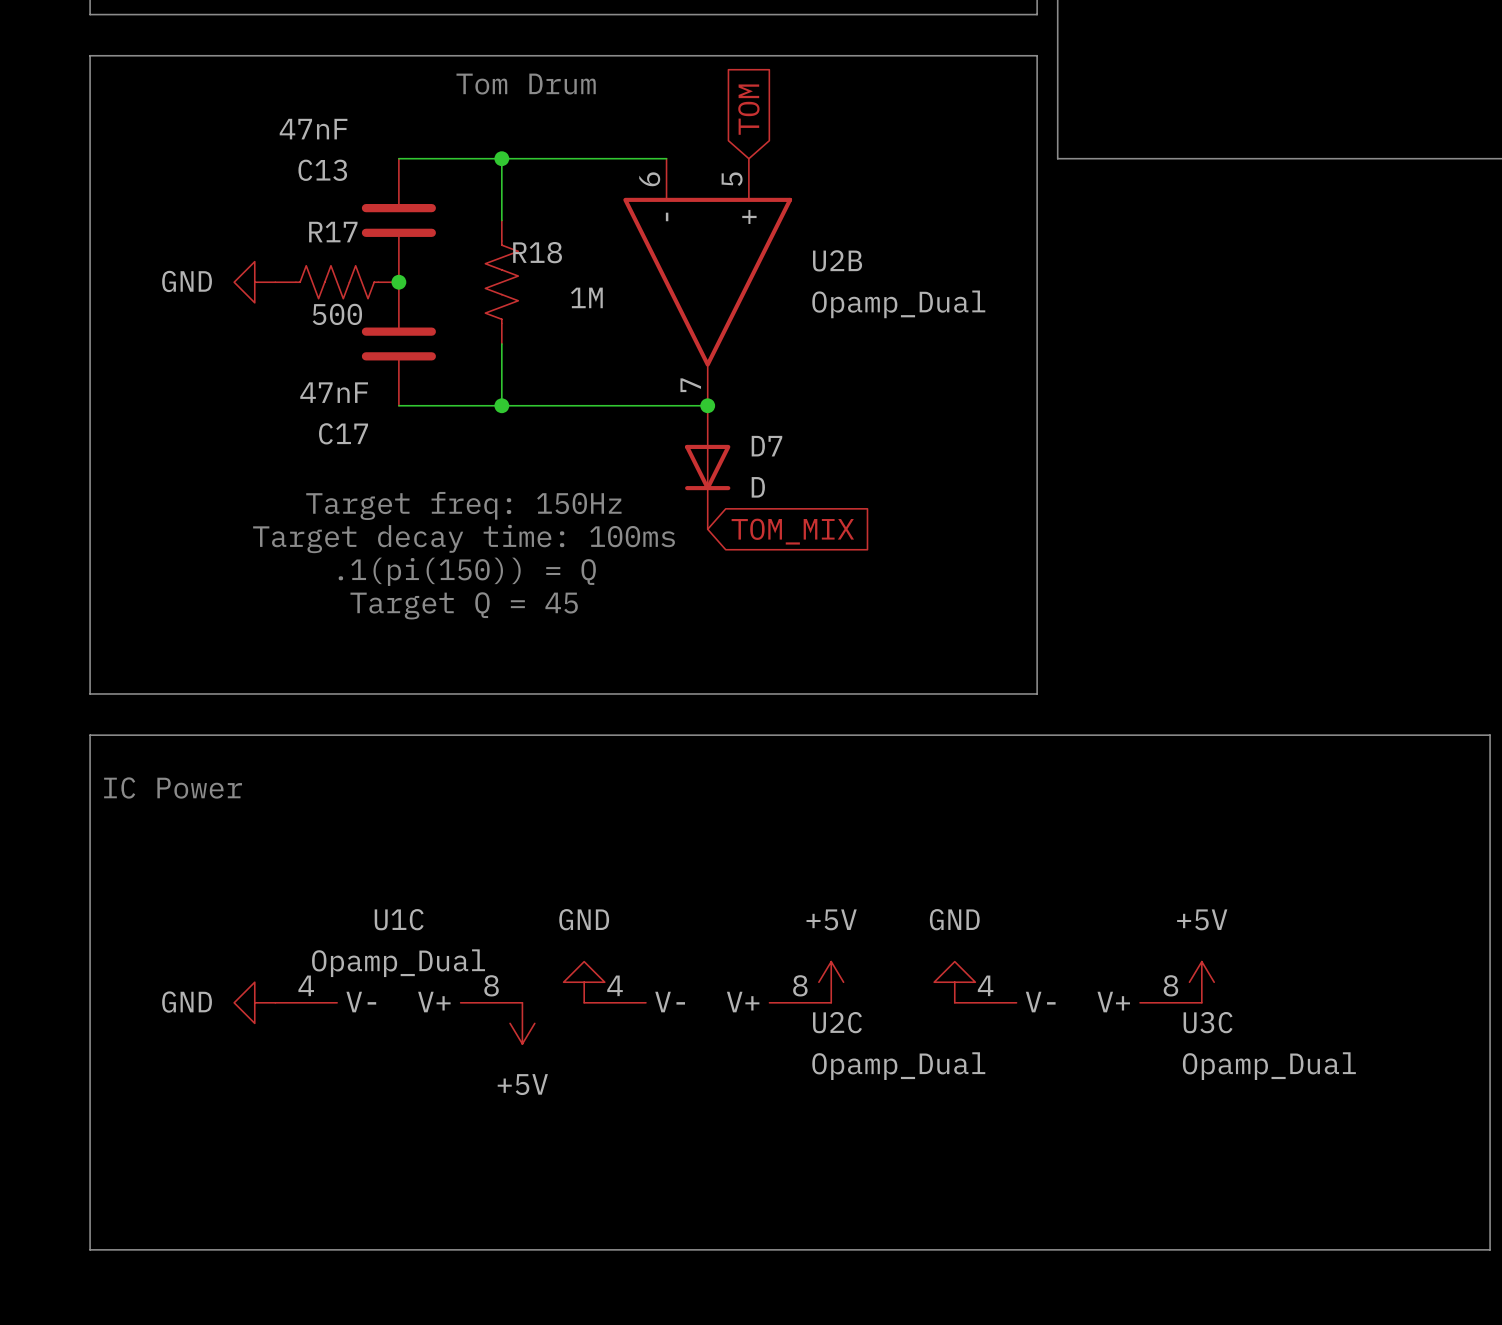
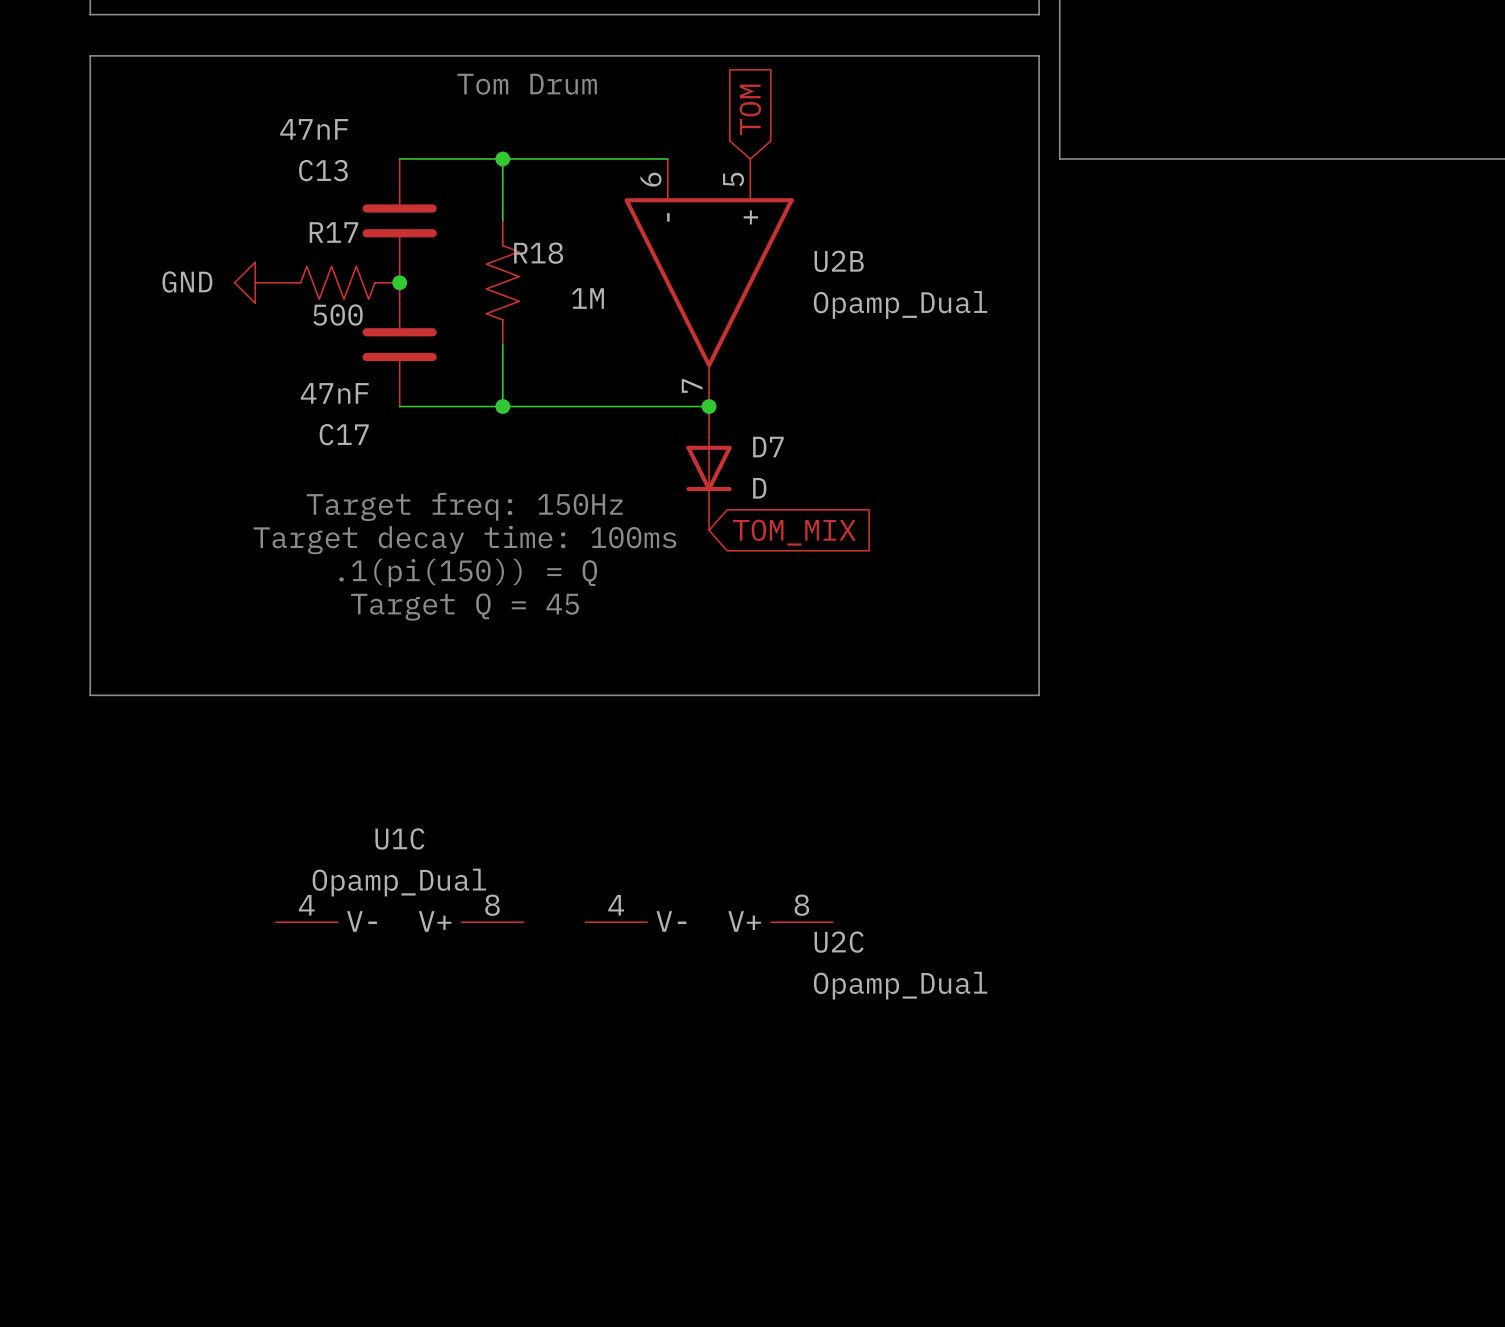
line: (90, 735) (90, 1249) (1490, 1249) (1490, 735) (90, 735) -> none
text: IC Power (173, 787) -> none
power symbol: GND (584, 982) -> none
power symbol: +5V (831, 982) -> none
power symbol: GND (954, 982) -> none
power symbol: +5V (1201, 982) -> none
power symbol: GND (254, 1002) -> none
U1C position: (398, 1002) -> (399, 922)
U2C position: (707, 1002) -> (709, 922)
U3C: Opamp_Dual (1078, 1002) -> none
power symbol: +5V (522, 1023) -> none

